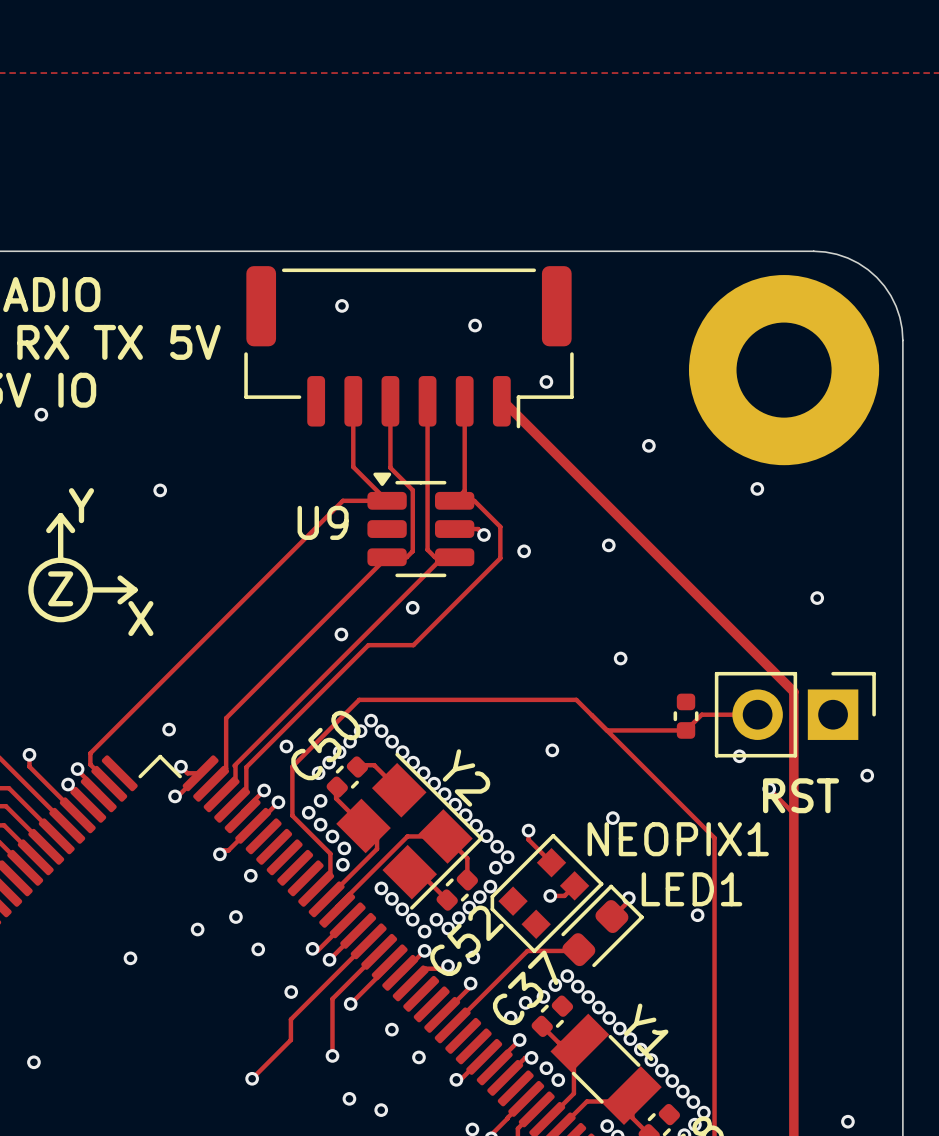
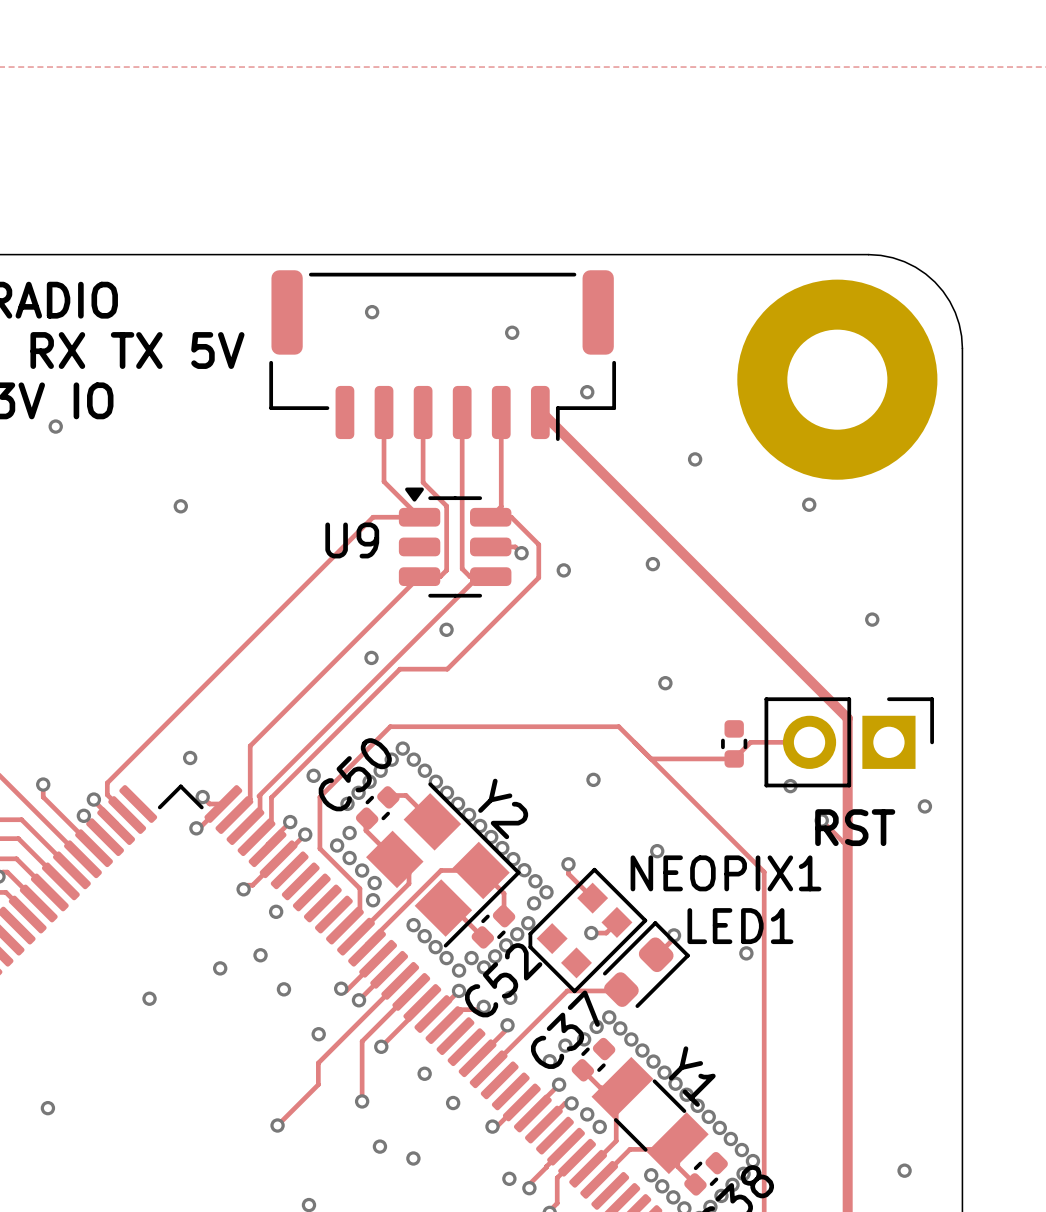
drawing: [28, 512, 138, 623] -> none

